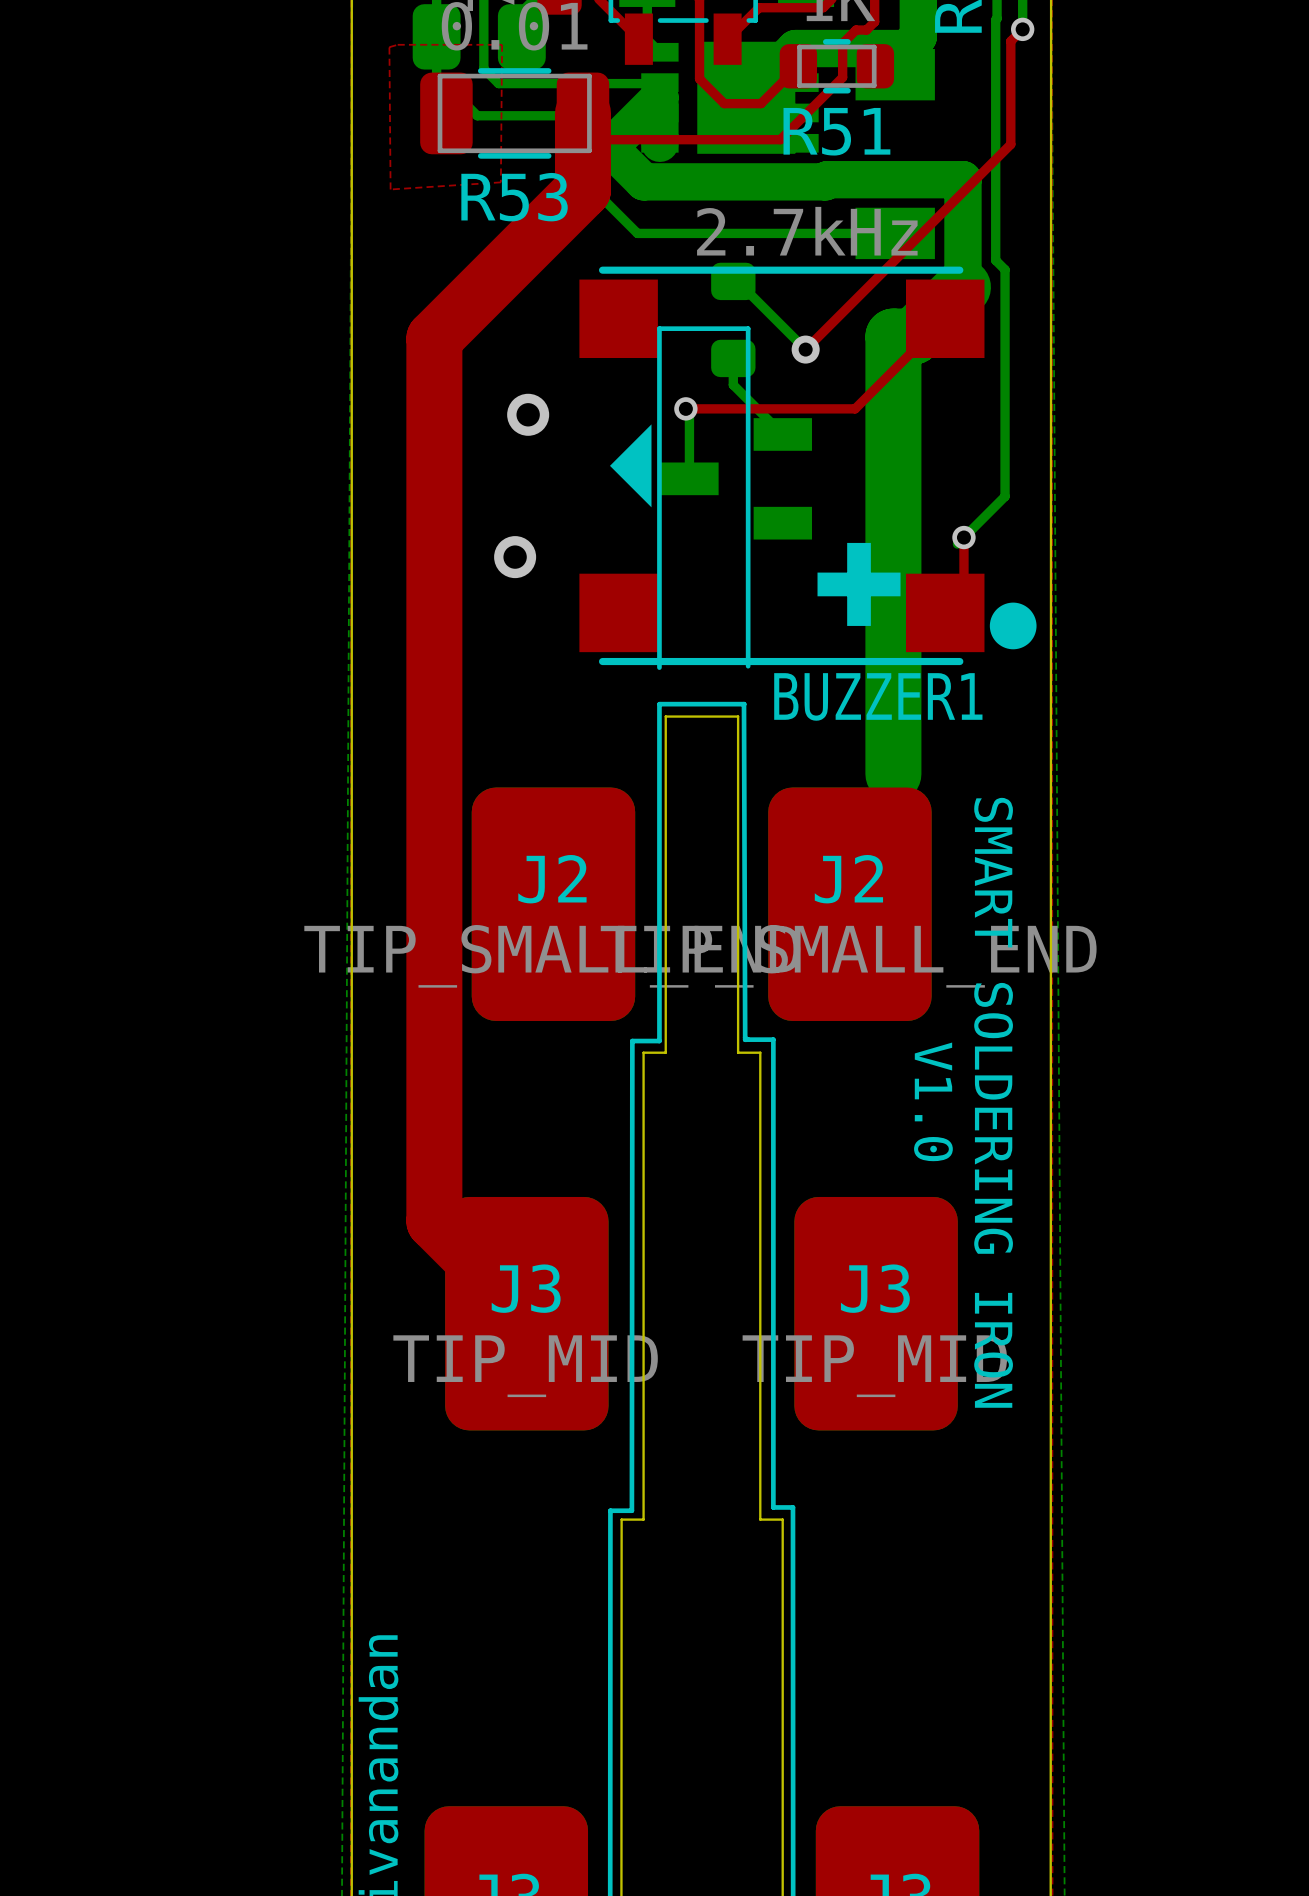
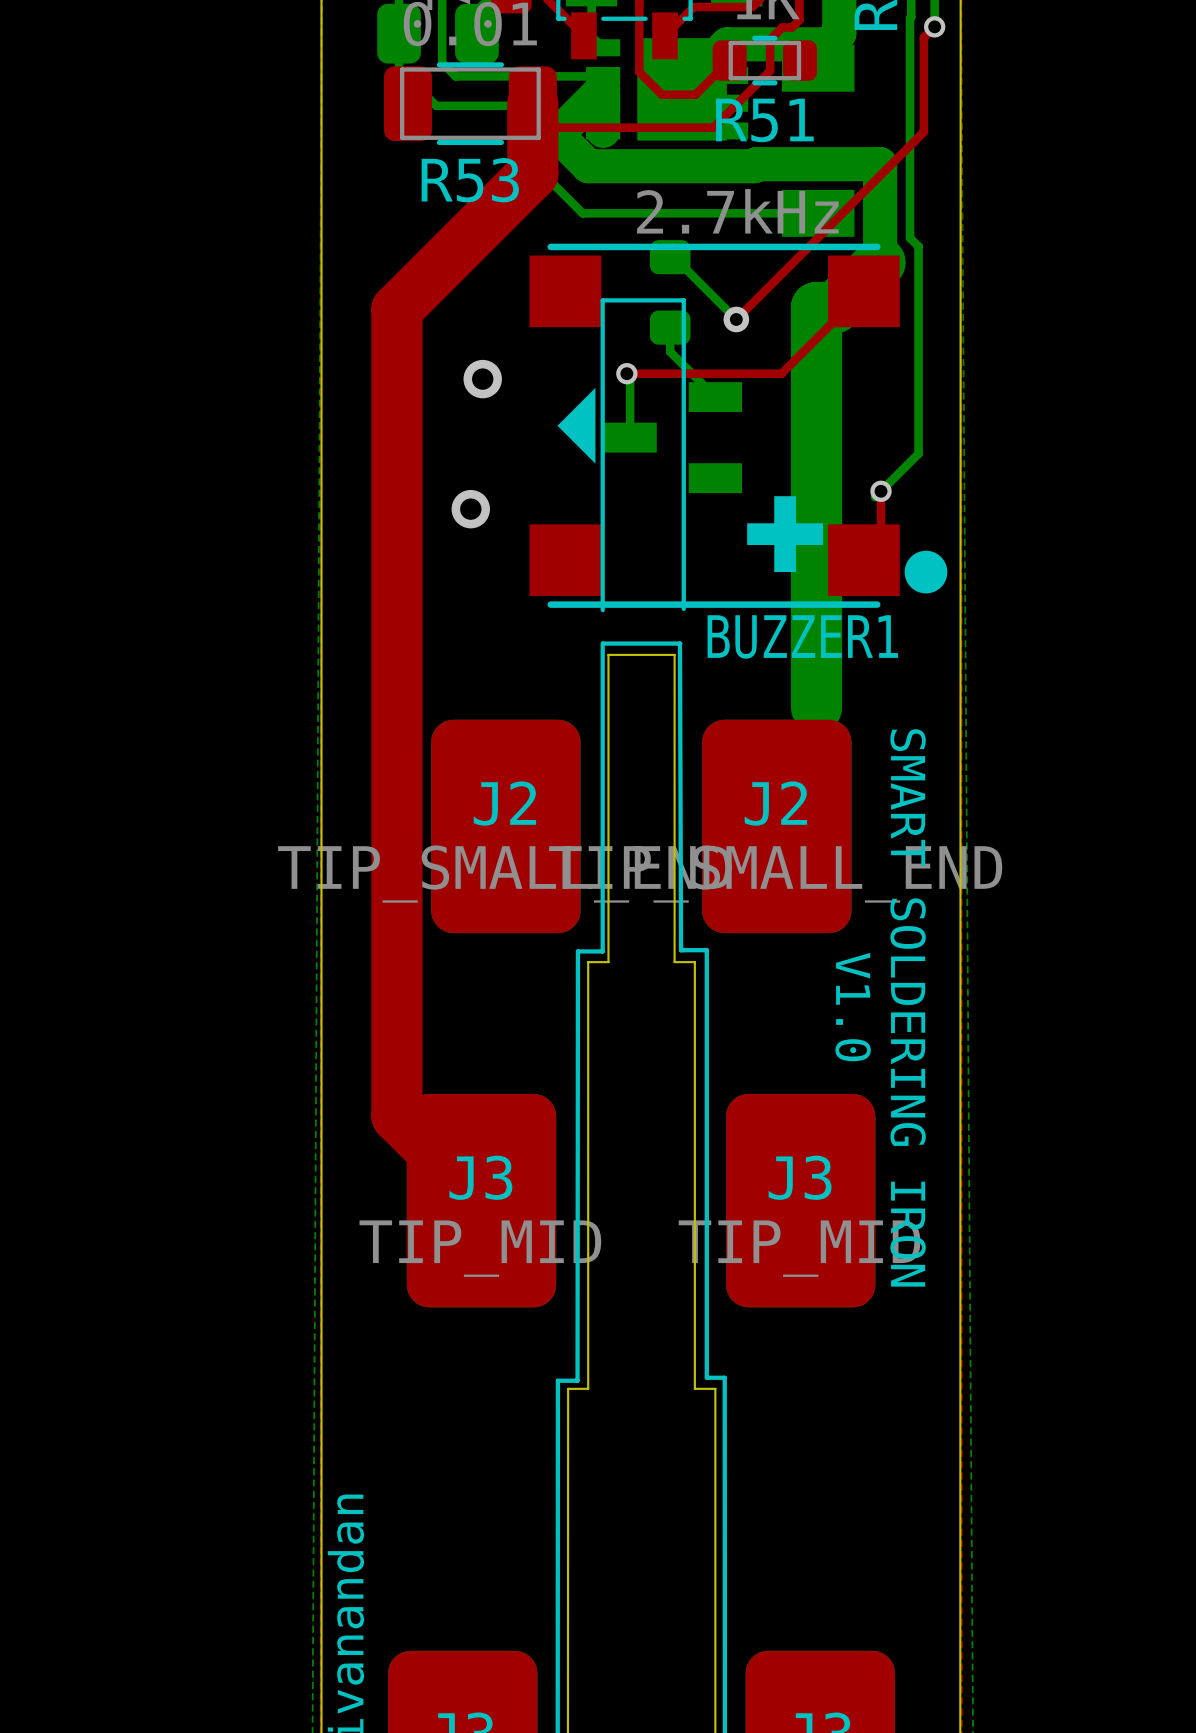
top zone outline: (397, 44) (502, 44) (500, 182) (390, 189) (389, 47) (397, 44) -> none

